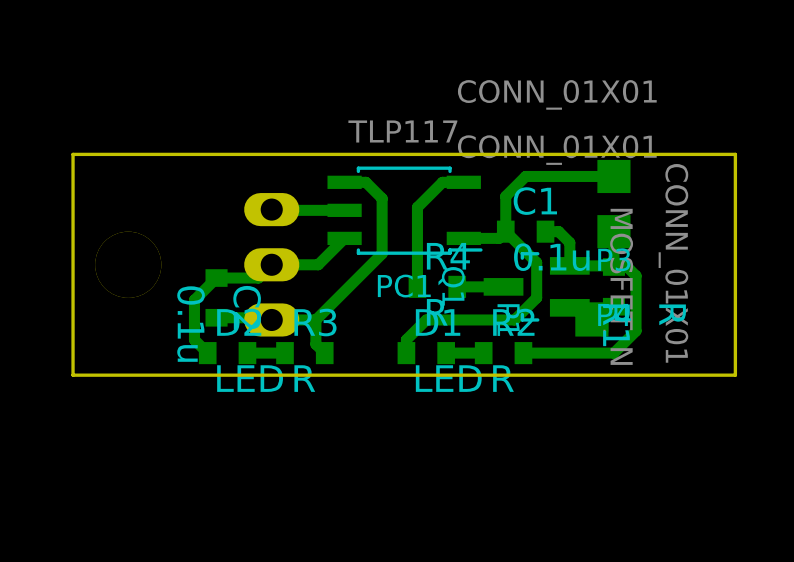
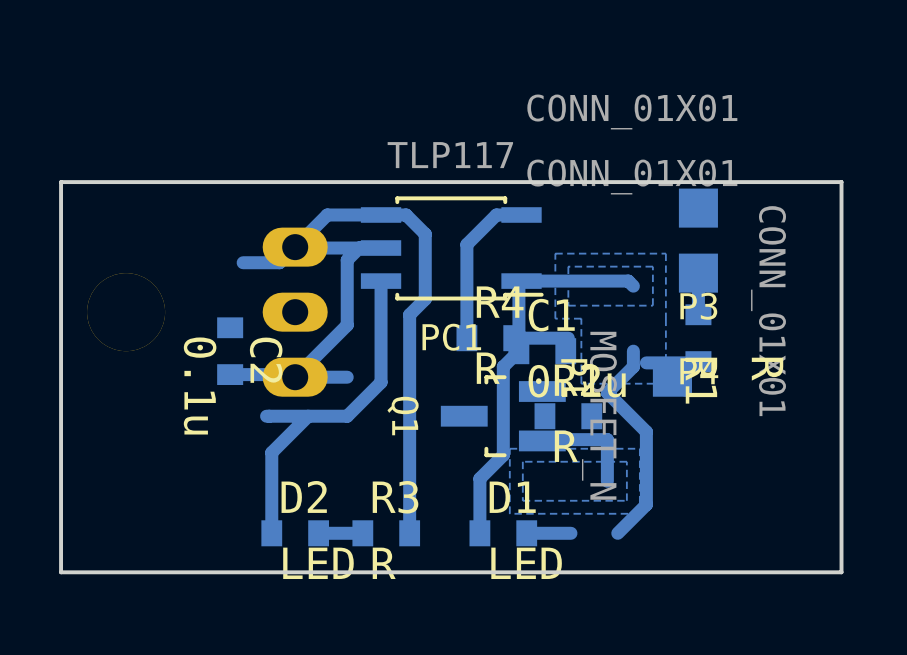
bottom track: (613, 176) (525, 176) (505, 196) (505, 233) -> none
bottom track: none -> (381, 214) (327, 214) (279, 262) (243, 262)
bottom track: none -> (359, 248) (347, 260) (347, 325) (295, 377)
bottom zone outline: none -> (665, 253) (665, 383) (581, 383) (581, 318) (555, 318) (555, 253) (665, 253)
bottom zone outline: none -> (652, 266) (652, 305) (568, 305) (568, 266) (652, 266)
C1 position: (525, 231) -> (542, 351)
bottom track: (545, 231) (558, 231) (569, 242) (569, 265) (627, 266) (636, 275) (636, 331) (613, 353) (523, 353) -> none
bottom track: (344, 238) (318, 264) (271, 264) (258, 278) (216, 278) (194, 300) (194, 339) (207, 353) -> (381, 281) (381, 382) (347, 416) (310, 416)
bottom track: none -> (521, 281) (518, 283) (518, 351) (503, 366) (503, 455) (479, 478) (479, 533)
bottom track: (499, 238) (505, 231) (536, 262) (536, 297) (514, 319) (426, 319) (406, 339) (406, 353) -> (563, 281) (628, 281) (633, 286)
bottom track: (368, 266) (315, 319) (315, 344) (324, 353) -> (409, 314) (409, 533)
Q1 position: (536, 286) -> (503, 416)
bottom track: none -> (633, 351) (633, 366) (607, 392) (646, 431) (646, 504) (617, 533)
D2 position: (227, 353) -> (295, 533)
bottom track: none -> (308, 416) (271, 452) (271, 533)
R3 position: (304, 353) -> (386, 533)
D1 position: (426, 353) -> (503, 533)
bottom track: (483, 353) (446, 353) -> (570, 533) (526, 533)
bottom track: none -> (542, 440) (607, 439) (607, 481)
board edge: (735, 375) (73, 375) -> (841, 442) (841, 572) (61, 572) (61, 442)
bottom zone outline: none -> (639, 448) (639, 513) (509, 513) (509, 448) (639, 448)
bottom zone outline: none -> (626, 461) (626, 500) (522, 500) (522, 461) (626, 461)
bottom track: none -> (362, 533) (318, 533)

